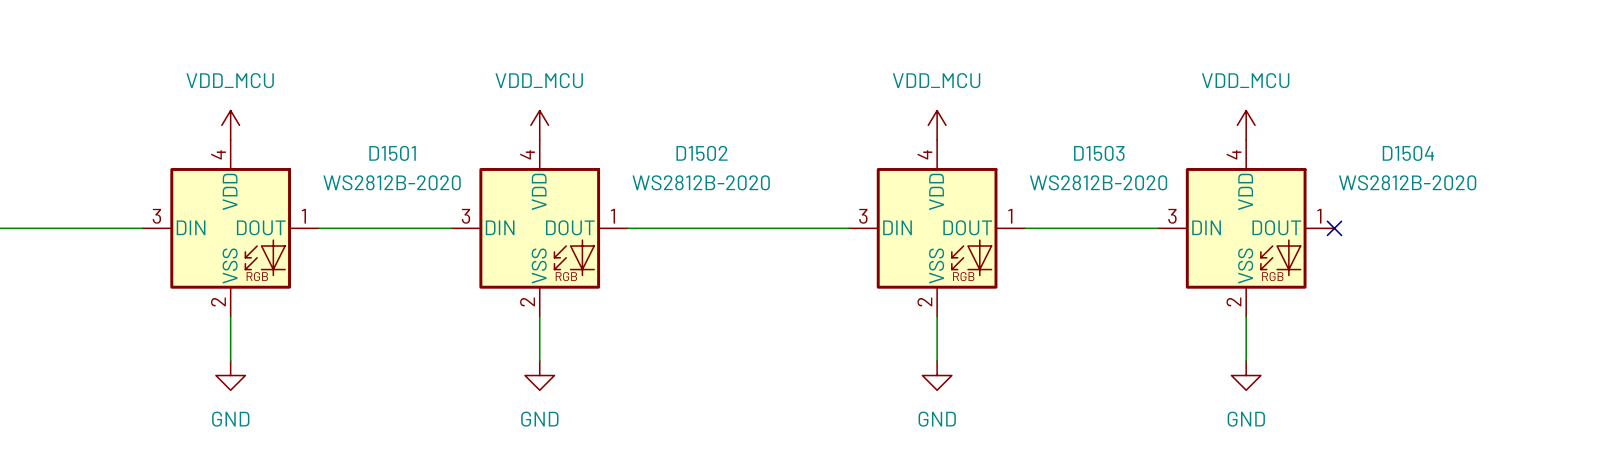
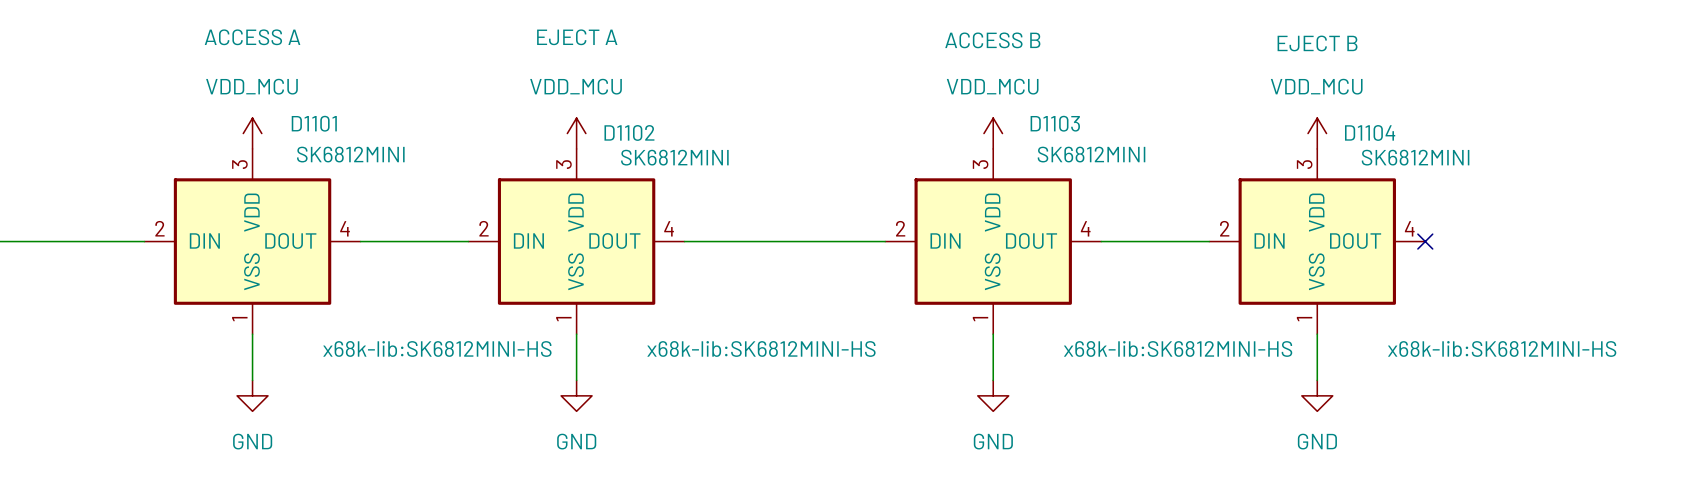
D1501: WS2812B-2020 (230, 228) -> none
D1101: none -> SK6812MINI (252, 241)
D1502: WS2812B-2020 (539, 228) -> none
D1102: none -> SK6812MINI (576, 241)
D1503: WS2812B-2020 (937, 228) -> none
D1103: none -> SK6812MINI (993, 241)
D1504: WS2812B-2020 (1246, 228) -> none
D1104: none -> SK6812MINI (1317, 241)
no-connect mark position: (1334, 228) -> (1425, 241)

